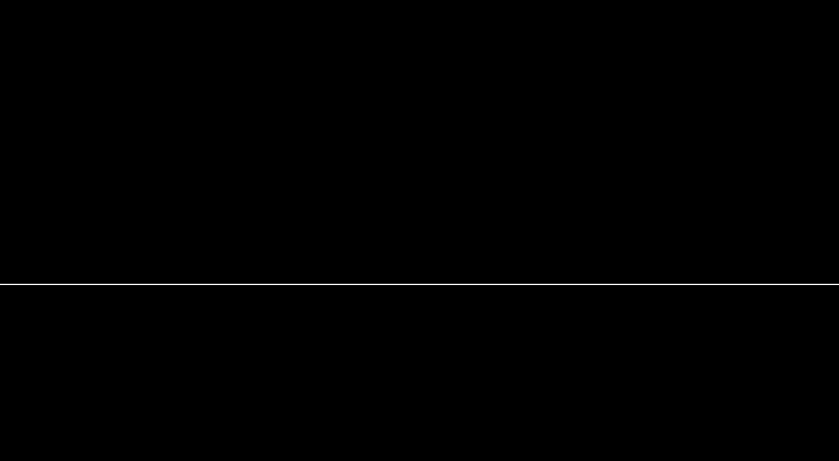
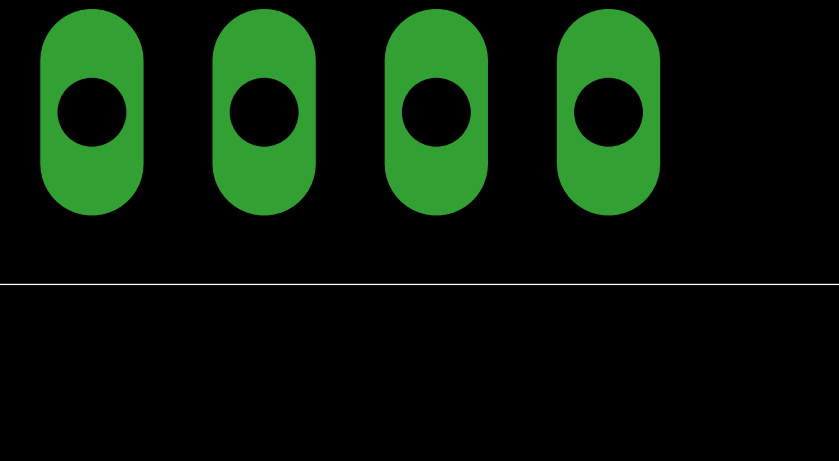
part: none -> (350, 112)

